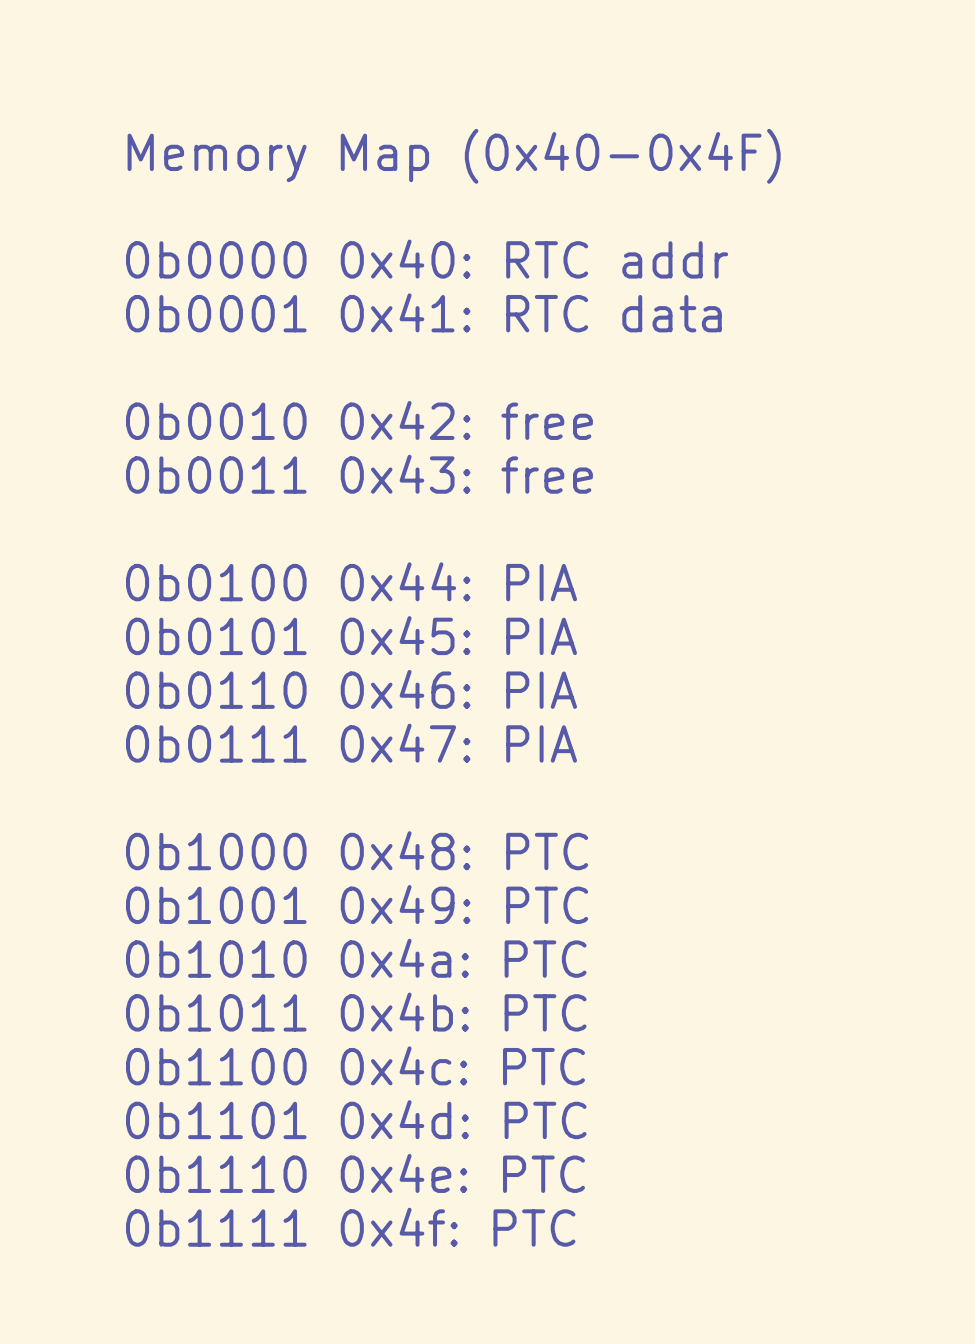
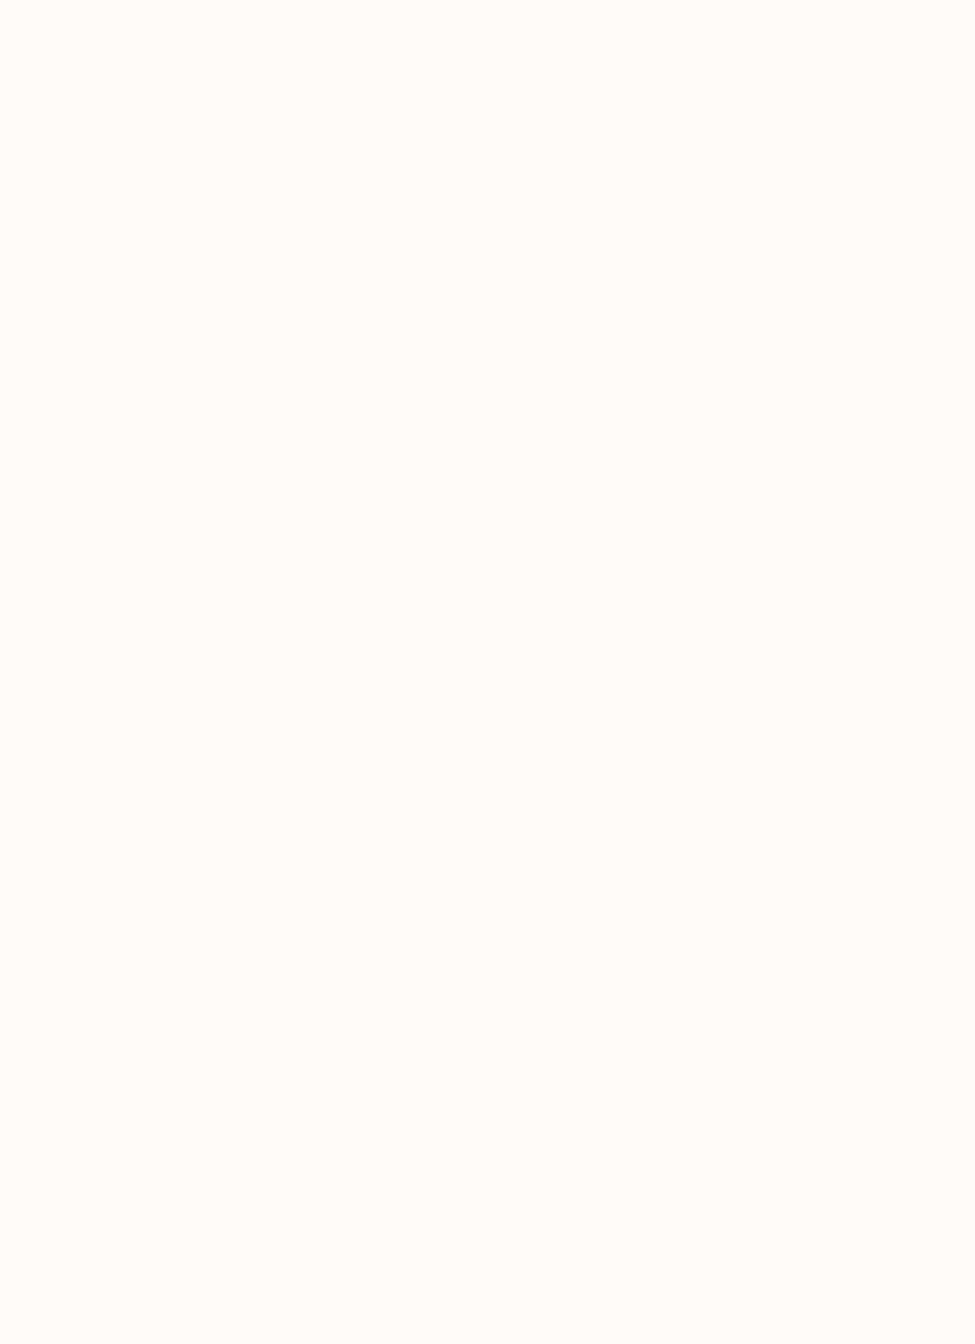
text: Memory Map (0x40-0x4F) (454, 156) -> none
text: 0b0000 0x40: RTC addr (427, 259) -> none
text: 0b0001 0x41: RTC data (423, 312) -> none
text: 0b0010 0x42: free (359, 420) -> none
text: 0b0011 0x43: free (359, 474) -> none
text: 0b0100 0x44: PIA (351, 581) -> none
text: 0b0101 0x45: PIA (351, 635) -> none
text: 0b0110 0x46: PIA (351, 689) -> none
text: 0b0111 0x47: PIA (351, 743) -> none
text: 0b1000 0x48: PTC (357, 850) -> none
text: 0b1001 0x49: PTC (357, 904) -> none
text: 0b1010 0x4a: PTC (356, 958) -> none
text: 0b1011 0x4b: PTC (356, 1012) -> none
text: 0b1100 0x4c: PTC (355, 1065) -> none
text: 0b1101 0x4d: PTC (356, 1119) -> none
text: 0b1110 0x4e: PTC (355, 1173) -> none
text: 0b1111 0x4f: PTC (350, 1227) -> none

